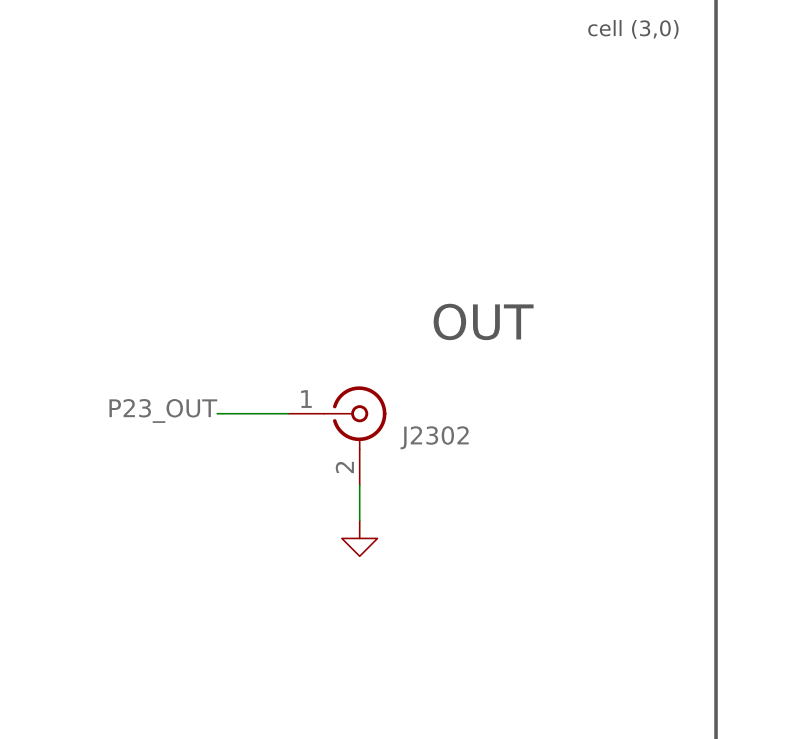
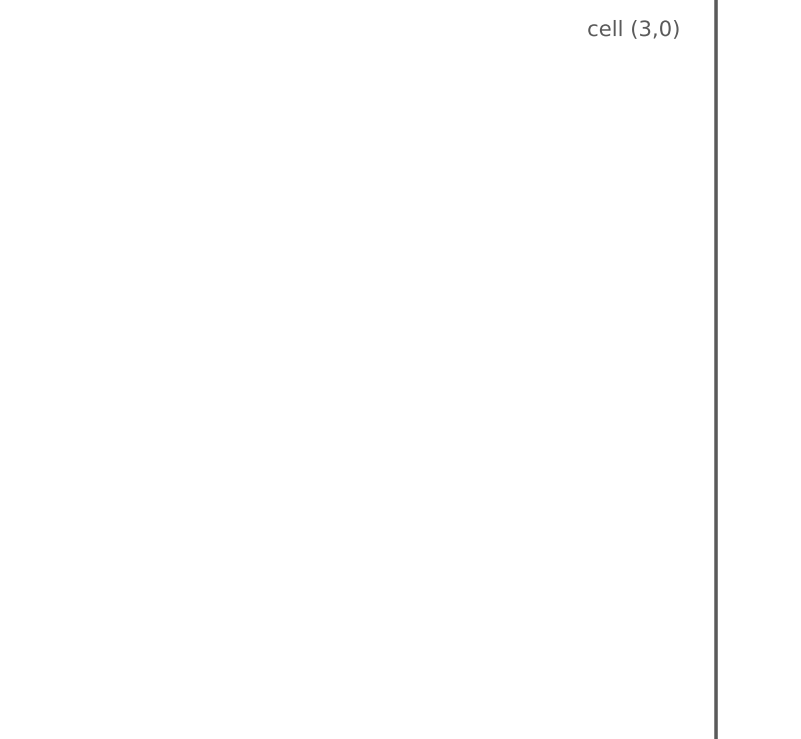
text: OUT (483, 321) -> none
label: P23_OUT (163, 410) -> none
wire: (217, 413) (288, 413) -> none
J2302: (337, 435) -> none
wire: (359, 484) (359, 520) -> none
power symbol: (359, 538) -> none

